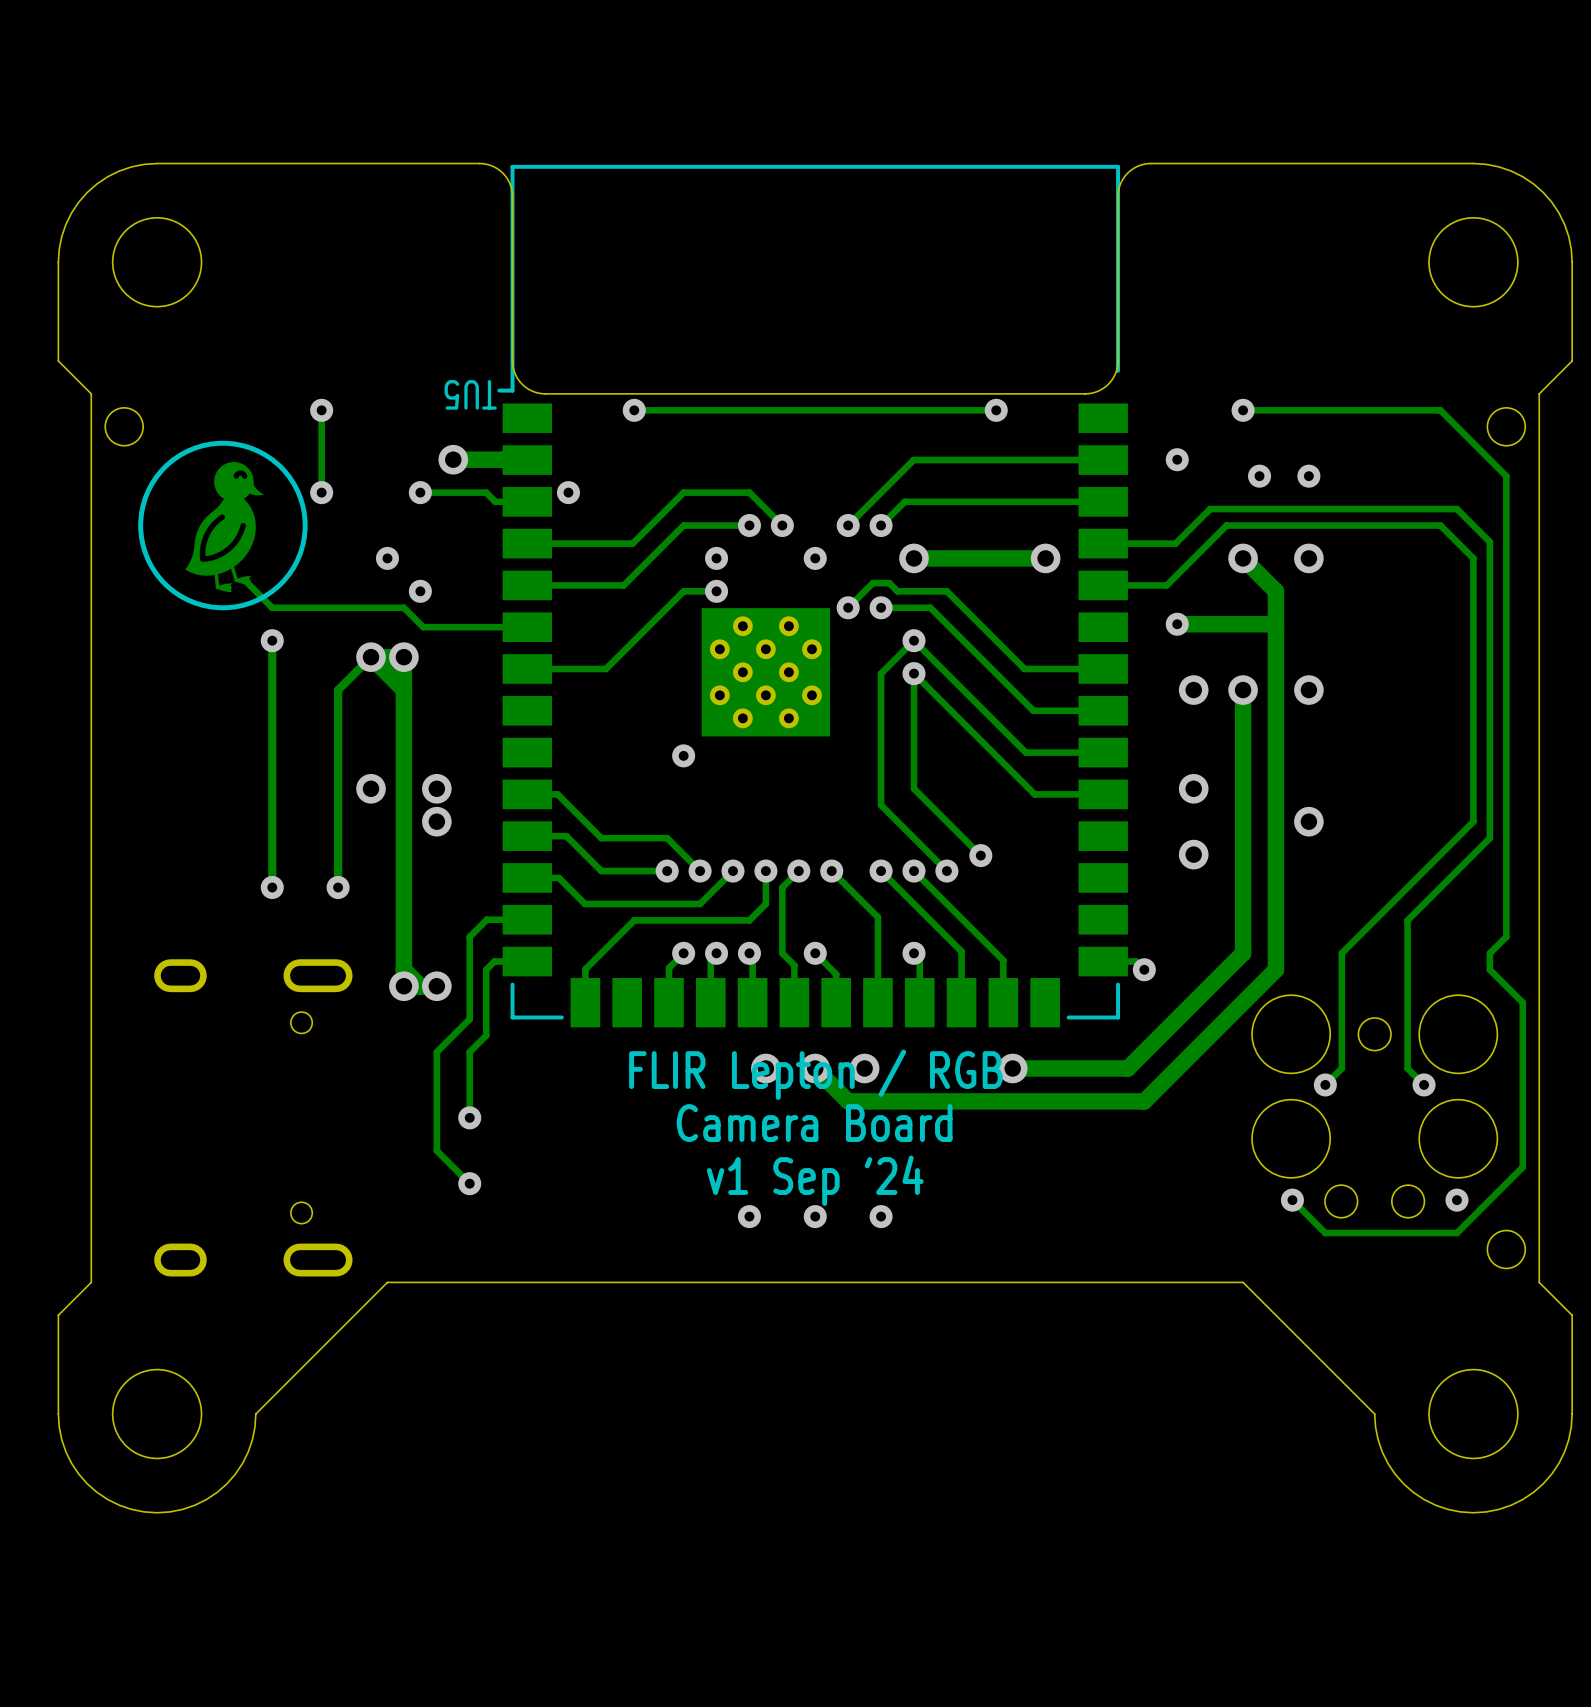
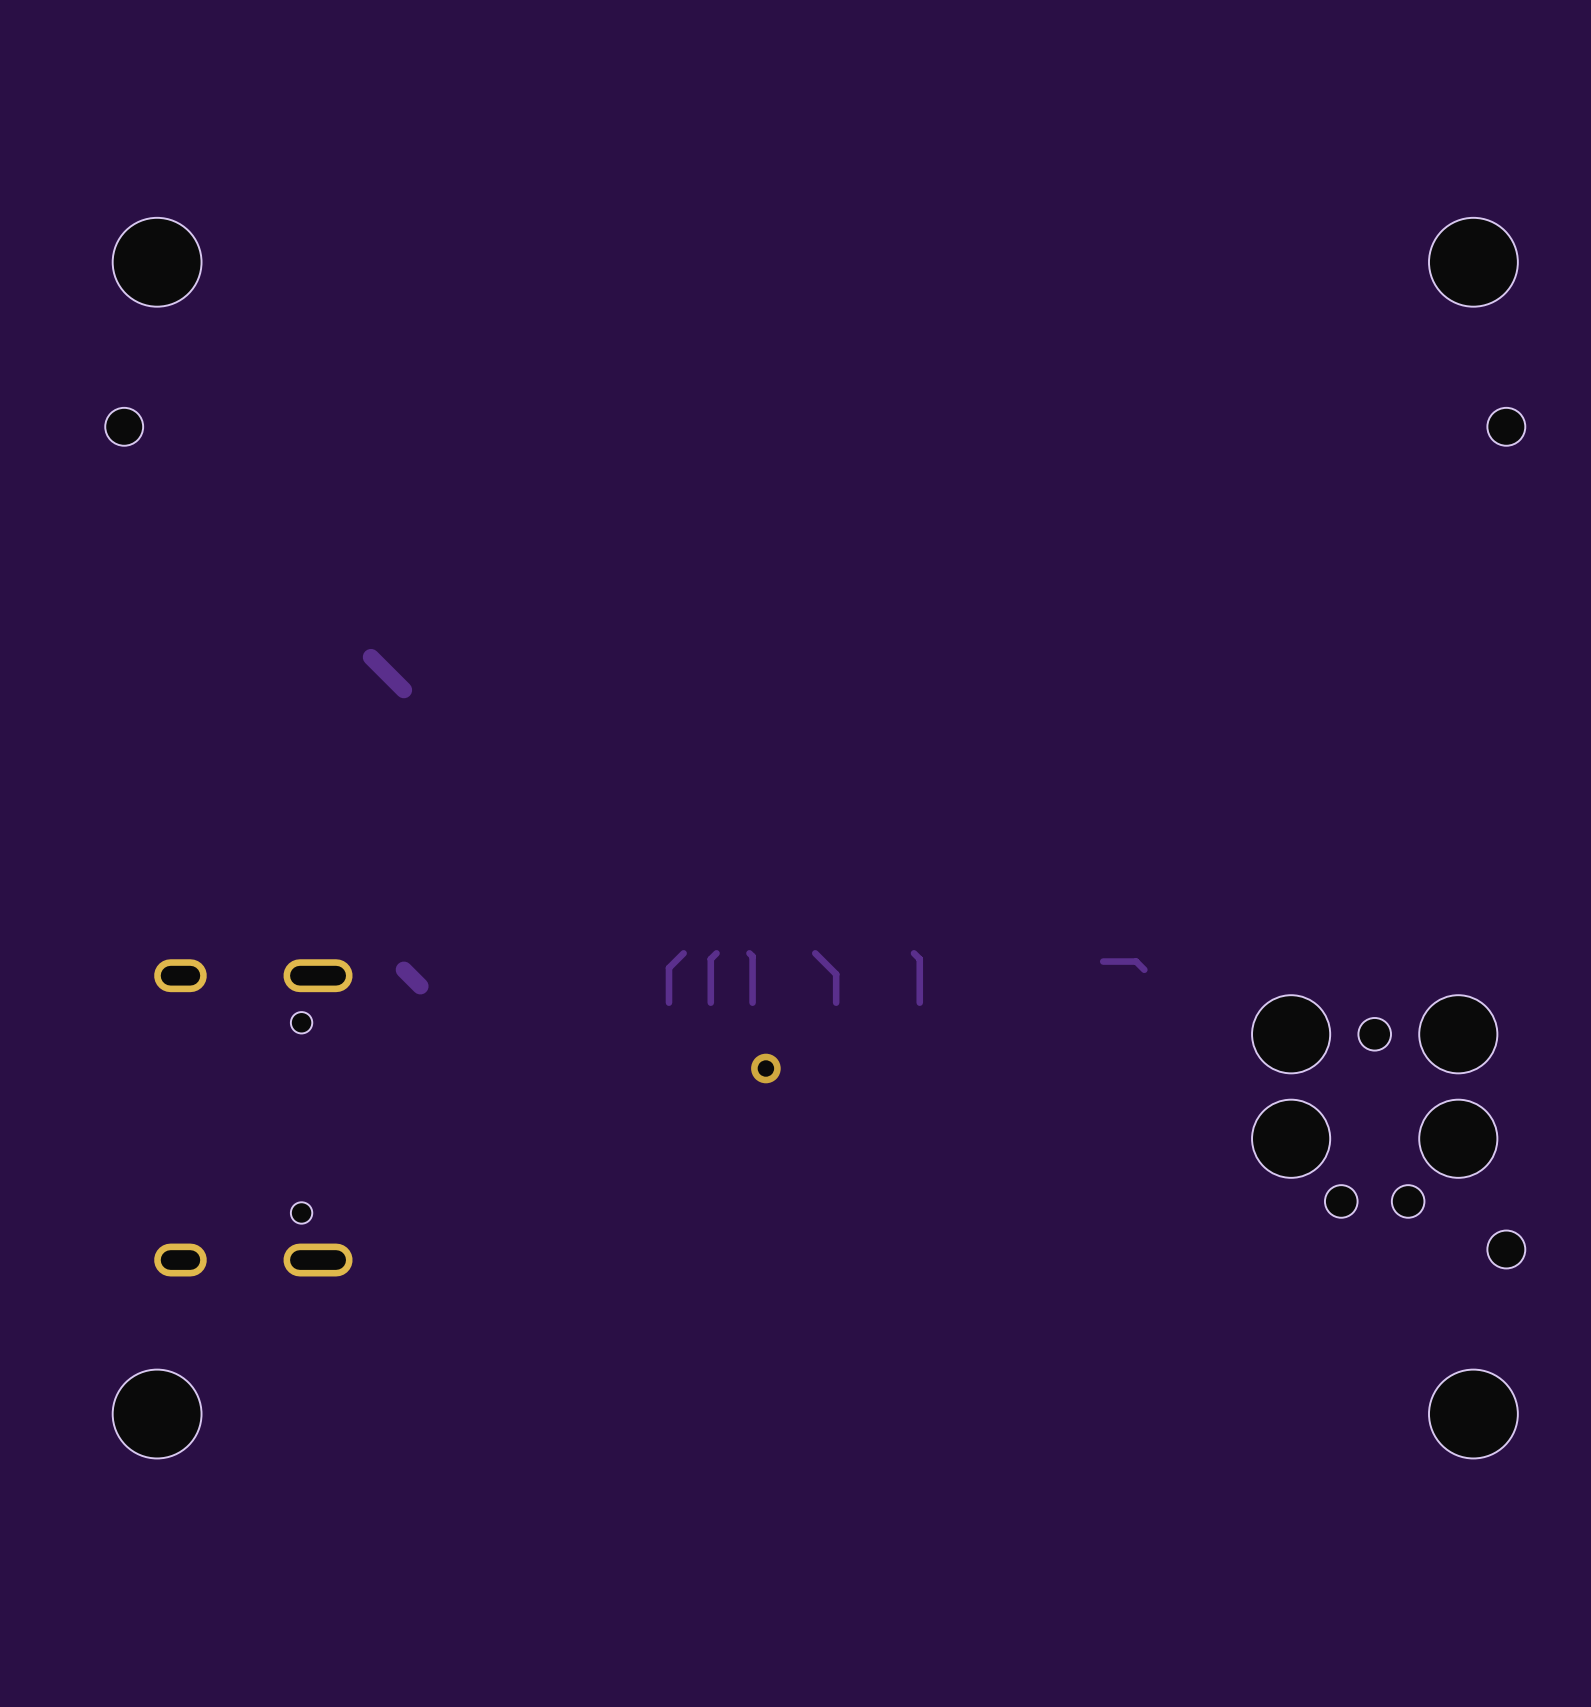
board edge: (1473, 163) (1150, 163) (1133, 168) (1123, 178) (1118, 192) (1117, 368) (1112, 378) (1105, 386) (1095, 392) (1085, 393) (538, 393) (522, 384) (513, 368) (512, 192) (507, 178) (493, 166) (479, 163) (157, 163) (131, 166) (119, 171) (107, 176) (87, 192) (78, 202) (65, 224) (61, 236) (58, 262) (58, 360) (91, 393) (91, 1282) (58, 1315) (59, 1426) (65, 1451) (78, 1474) (87, 1483) (97, 1492) (119, 1505) (144, 1511) (169, 1511) (182, 1509) (194, 1505) (217, 1492) (235, 1474) (248, 1451) (254, 1426) (255, 1414) (387, 1282) (1243, 1282) (1374, 1414) (1375, 1426) (1382, 1451) (1395, 1474) (1413, 1492) (1435, 1505) (1447, 1509) (1460, 1511) (1486, 1511) (1511, 1505) (1522, 1499) (1543, 1483) (1558, 1463) (1564, 1451) (1571, 1426) (1572, 1315) (1539, 1282) (1539, 393) (1572, 360) (1572, 262) (1571, 249) (1564, 224) (1558, 212) (1543, 192) (1533, 183) (1511, 171) (1498, 166) (1473, 163) -> none
track: (321, 410) (321, 492) -> none
via: (321, 410) -> none
via: (634, 410) -> none
track: (996, 410) (634, 410) -> none
via: (996, 410) -> none
track: (1243, 410) (1440, 410) (1506, 476) (1506, 936) (1489, 953) (1489, 969) (1522, 1002) (1522, 1167) (1456, 1233) (1325, 1233) (1292, 1200) -> none
via: (1243, 410) -> none
via: (453, 459) -> none
track: (502, 459) (453, 459) -> none
via: (1177, 459) -> none
track: (1103, 460) (913, 460) (848, 525) -> none
via: (1259, 476) -> none
via: (1308, 476) -> none
via: (321, 492) -> none
track: (420, 492) (486, 492) (495, 501) (527, 501) -> none
via: (420, 492) -> none
via: (568, 492) -> none
track: (1103, 501) (904, 501) (881, 525) -> none
part: (222, 525) -> none
track: (749, 525) (683, 525) (623, 585) (527, 585) -> none
via: (749, 525) -> none
track: (782, 525) (749, 492) (683, 492) (632, 543) (527, 543) -> none
via: (782, 525) -> none
via: (848, 525) -> none
via: (881, 525) -> none
track: (1103, 543) (1175, 543) (1210, 509) (1456, 509) (1489, 541) (1489, 838) (1407, 920) (1407, 1068) (1424, 1084) -> none
via: (387, 558) -> none
via: (716, 558) -> none
via: (815, 558) -> none
via: (913, 558) -> none
track: (1045, 558) (913, 558) -> none
via: (1045, 558) -> none
track: (1243, 558) (1275, 591) (1275, 969) (1144, 1101) (848, 1101) (815, 1068) -> none
via: (1243, 558) -> none
via: (1308, 558) -> none
track: (247, 583) (272, 607) (403, 607) (423, 627) (527, 627) -> none
track: (1103, 585) (1166, 585) (1226, 525) (1440, 525) (1473, 558) (1473, 821) (1341, 953) (1341, 1068) (1325, 1084) -> none
via: (420, 591) -> none
track: (716, 591) (683, 591) (605, 669) (527, 669) -> none
via: (716, 591) -> none
TU5: (812, 596) -> none
track: (848, 607) (872, 583) (889, 583) (897, 591) (946, 591) (1024, 669) (1103, 669) -> none
via: (848, 607) -> none
track: (881, 607) (930, 607) (1033, 710) (1103, 710) -> none
via: (881, 607) -> none
via: (1177, 624) -> none
track: (1275, 624) (1177, 624) -> none
track: (272, 640) (272, 887) -> none
via: (272, 640) -> none
via: (913, 640) -> none
via: (371, 657) -> none
via: (403, 657) -> none
via: (913, 673) -> none
via: (1193, 690) -> none
track: (1243, 690) (1243, 953) (1127, 1068) (1012, 1068) -> none
via: (1243, 690) -> none
via: (1308, 690) -> none
track: (1103, 752) (1025, 752) (913, 640) (881, 673) (881, 805) (946, 871) -> none
via: (683, 755) -> none
via: (371, 788) -> none
via: (436, 788) -> none
via: (1193, 788) -> none
track: (527, 794) (557, 794) (601, 838) (667, 838) (700, 871) -> none
track: (1103, 794) (1034, 794) (913, 673) (913, 788) (980, 855) -> none
via: (436, 821) -> none
via: (1308, 821) -> none
track: (527, 836) (566, 836) (601, 871) (667, 871) -> none
via: (1193, 854) -> none
via: (980, 855) -> none
via: (667, 871) -> none
via: (700, 871) -> none
track: (733, 871) (700, 903) (584, 903) (558, 877) (527, 877) -> none
via: (733, 871) -> none
track: (765, 871) (765, 903) (749, 920) (634, 920) (585, 969) (585, 1002) -> none
via: (765, 871) -> none
track: (798, 871) (782, 887) (782, 953) (794, 965) (794, 1002) -> none
via: (798, 871) -> none
track: (831, 871) (877, 917) (877, 1002) -> none
via: (831, 871) -> none
track: (881, 871) (961, 951) (961, 1002) -> none
via: (881, 871) -> none
track: (913, 871) (1003, 960) (1003, 1002) -> none
via: (913, 871) -> none
via: (946, 871) -> none
via: (272, 887) -> none
track: (338, 887) (338, 690) (371, 657) (403, 657) (403, 986) (436, 986) -> none
via: (338, 887) -> none
track: (527, 919) (486, 919) (469, 936) (469, 1019) (436, 1052) (436, 1150) (469, 1183) -> none
via: (683, 953) -> none
via: (716, 953) -> none
via: (749, 953) -> none
via: (815, 953) -> none
via: (913, 953) -> none
track: (527, 961) (494, 961) (486, 969) (486, 1035) (469, 1052) (469, 1117) -> none
via: (1144, 969) -> none
via: (403, 986) -> none
via: (436, 986) -> none
via: (815, 1068) -> none
via: (864, 1068) -> none
via: (1012, 1068) -> none
text: FLIR Lepton / RGB (815, 1074) -> none
via: (1325, 1084) -> none
via: (1424, 1084) -> none
via: (469, 1117) -> none
text: Camera Board (814, 1123) -> none
text: v1 Sep '24 (815, 1180) -> none
via: (469, 1183) -> none
via: (1292, 1200) -> none
via: (1456, 1200) -> none
via: (749, 1216) -> none
via: (815, 1216) -> none
via: (881, 1216) -> none

